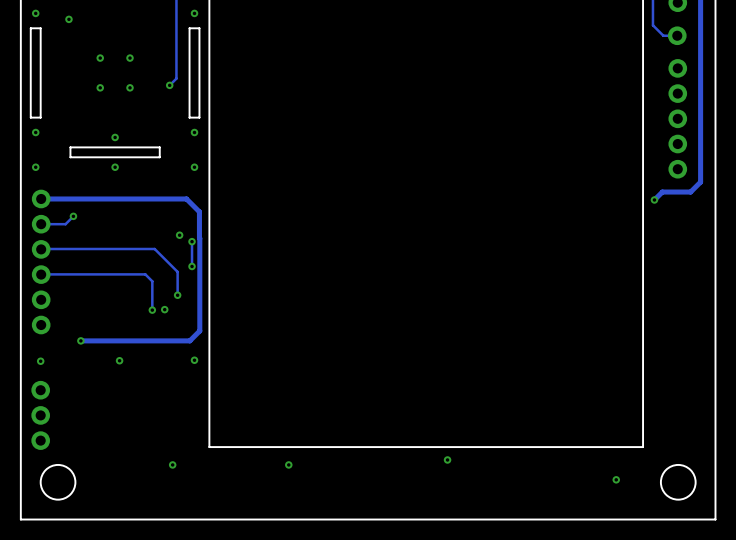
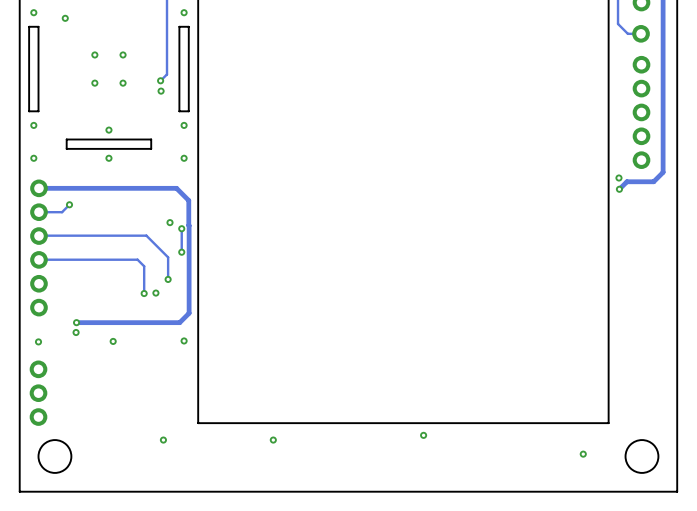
via: none -> (161, 91)
via: none -> (618, 178)
via: none -> (76, 332)

